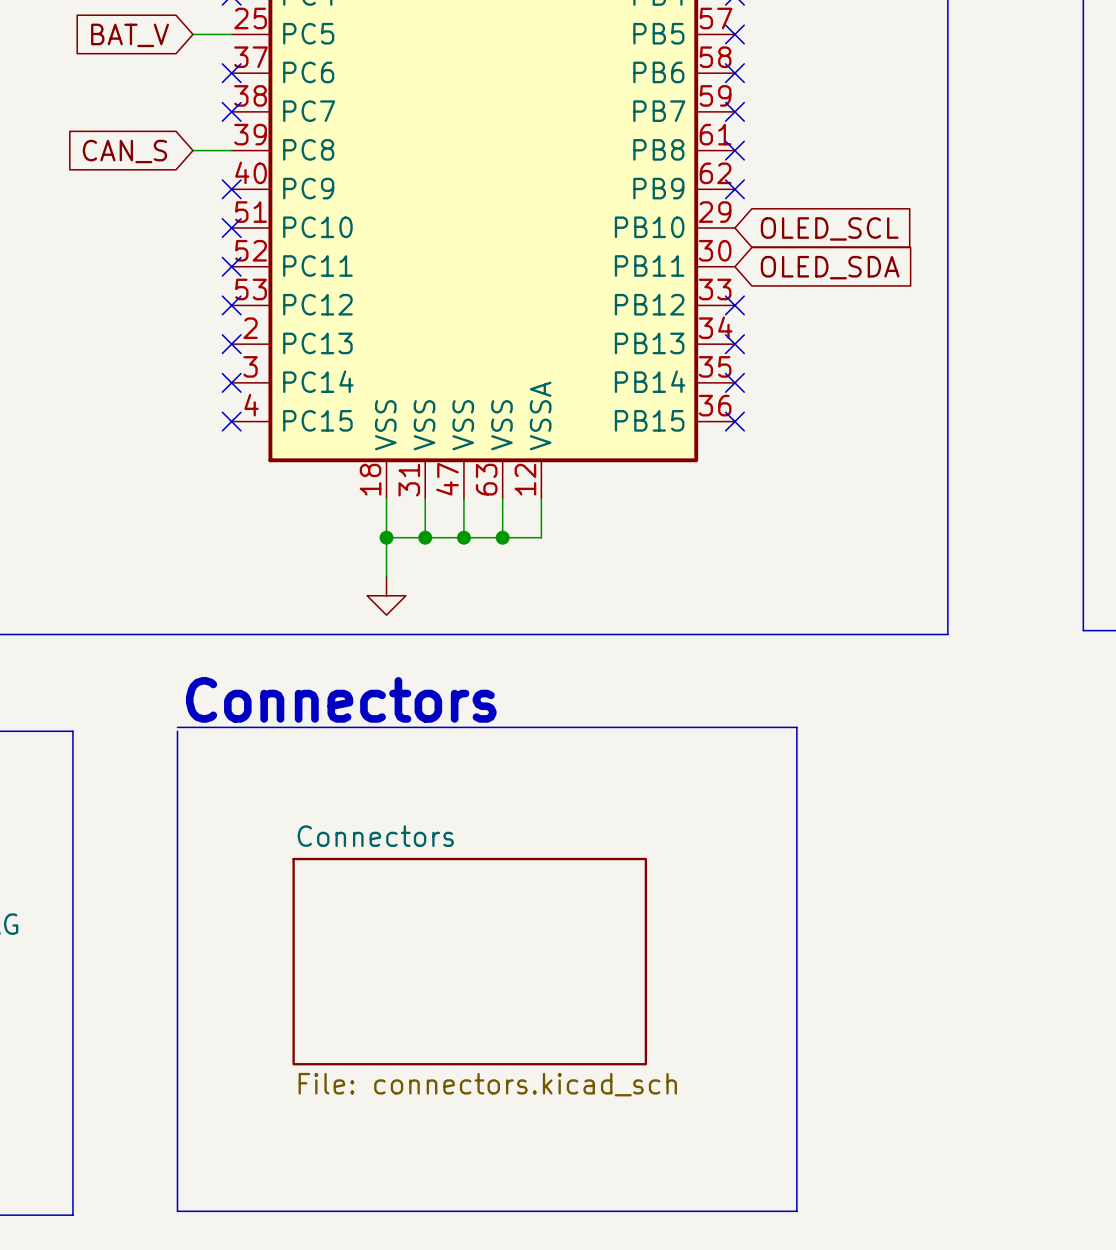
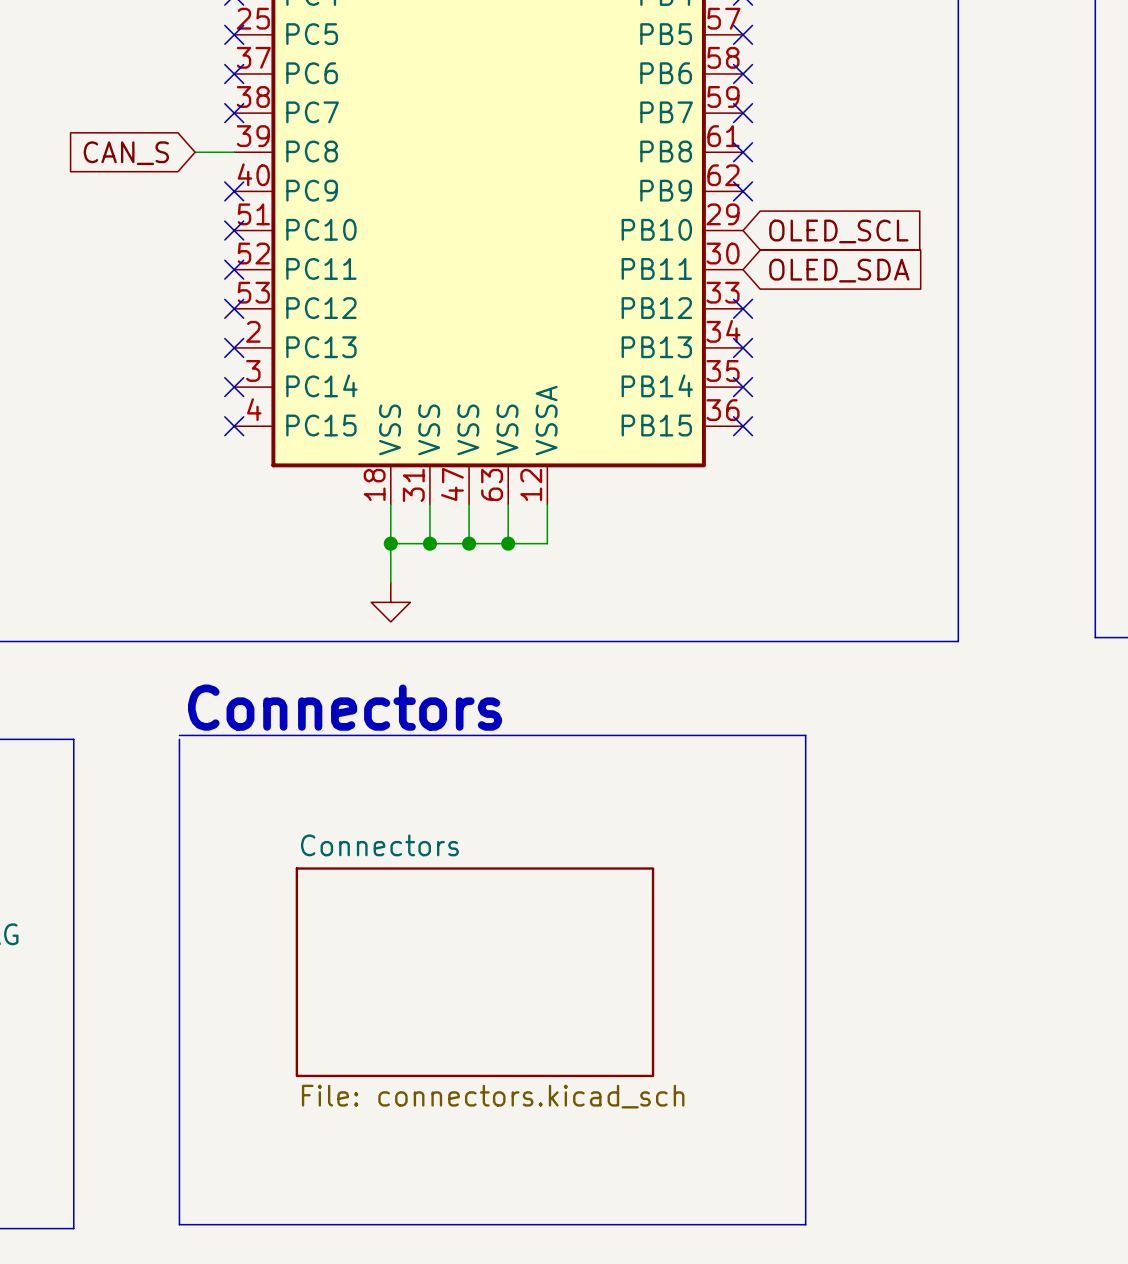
wire: (192, 34) (231, 34) -> none
no-connect mark: none -> (234, 34)
global label: BAT_V (130, 35) -> none

